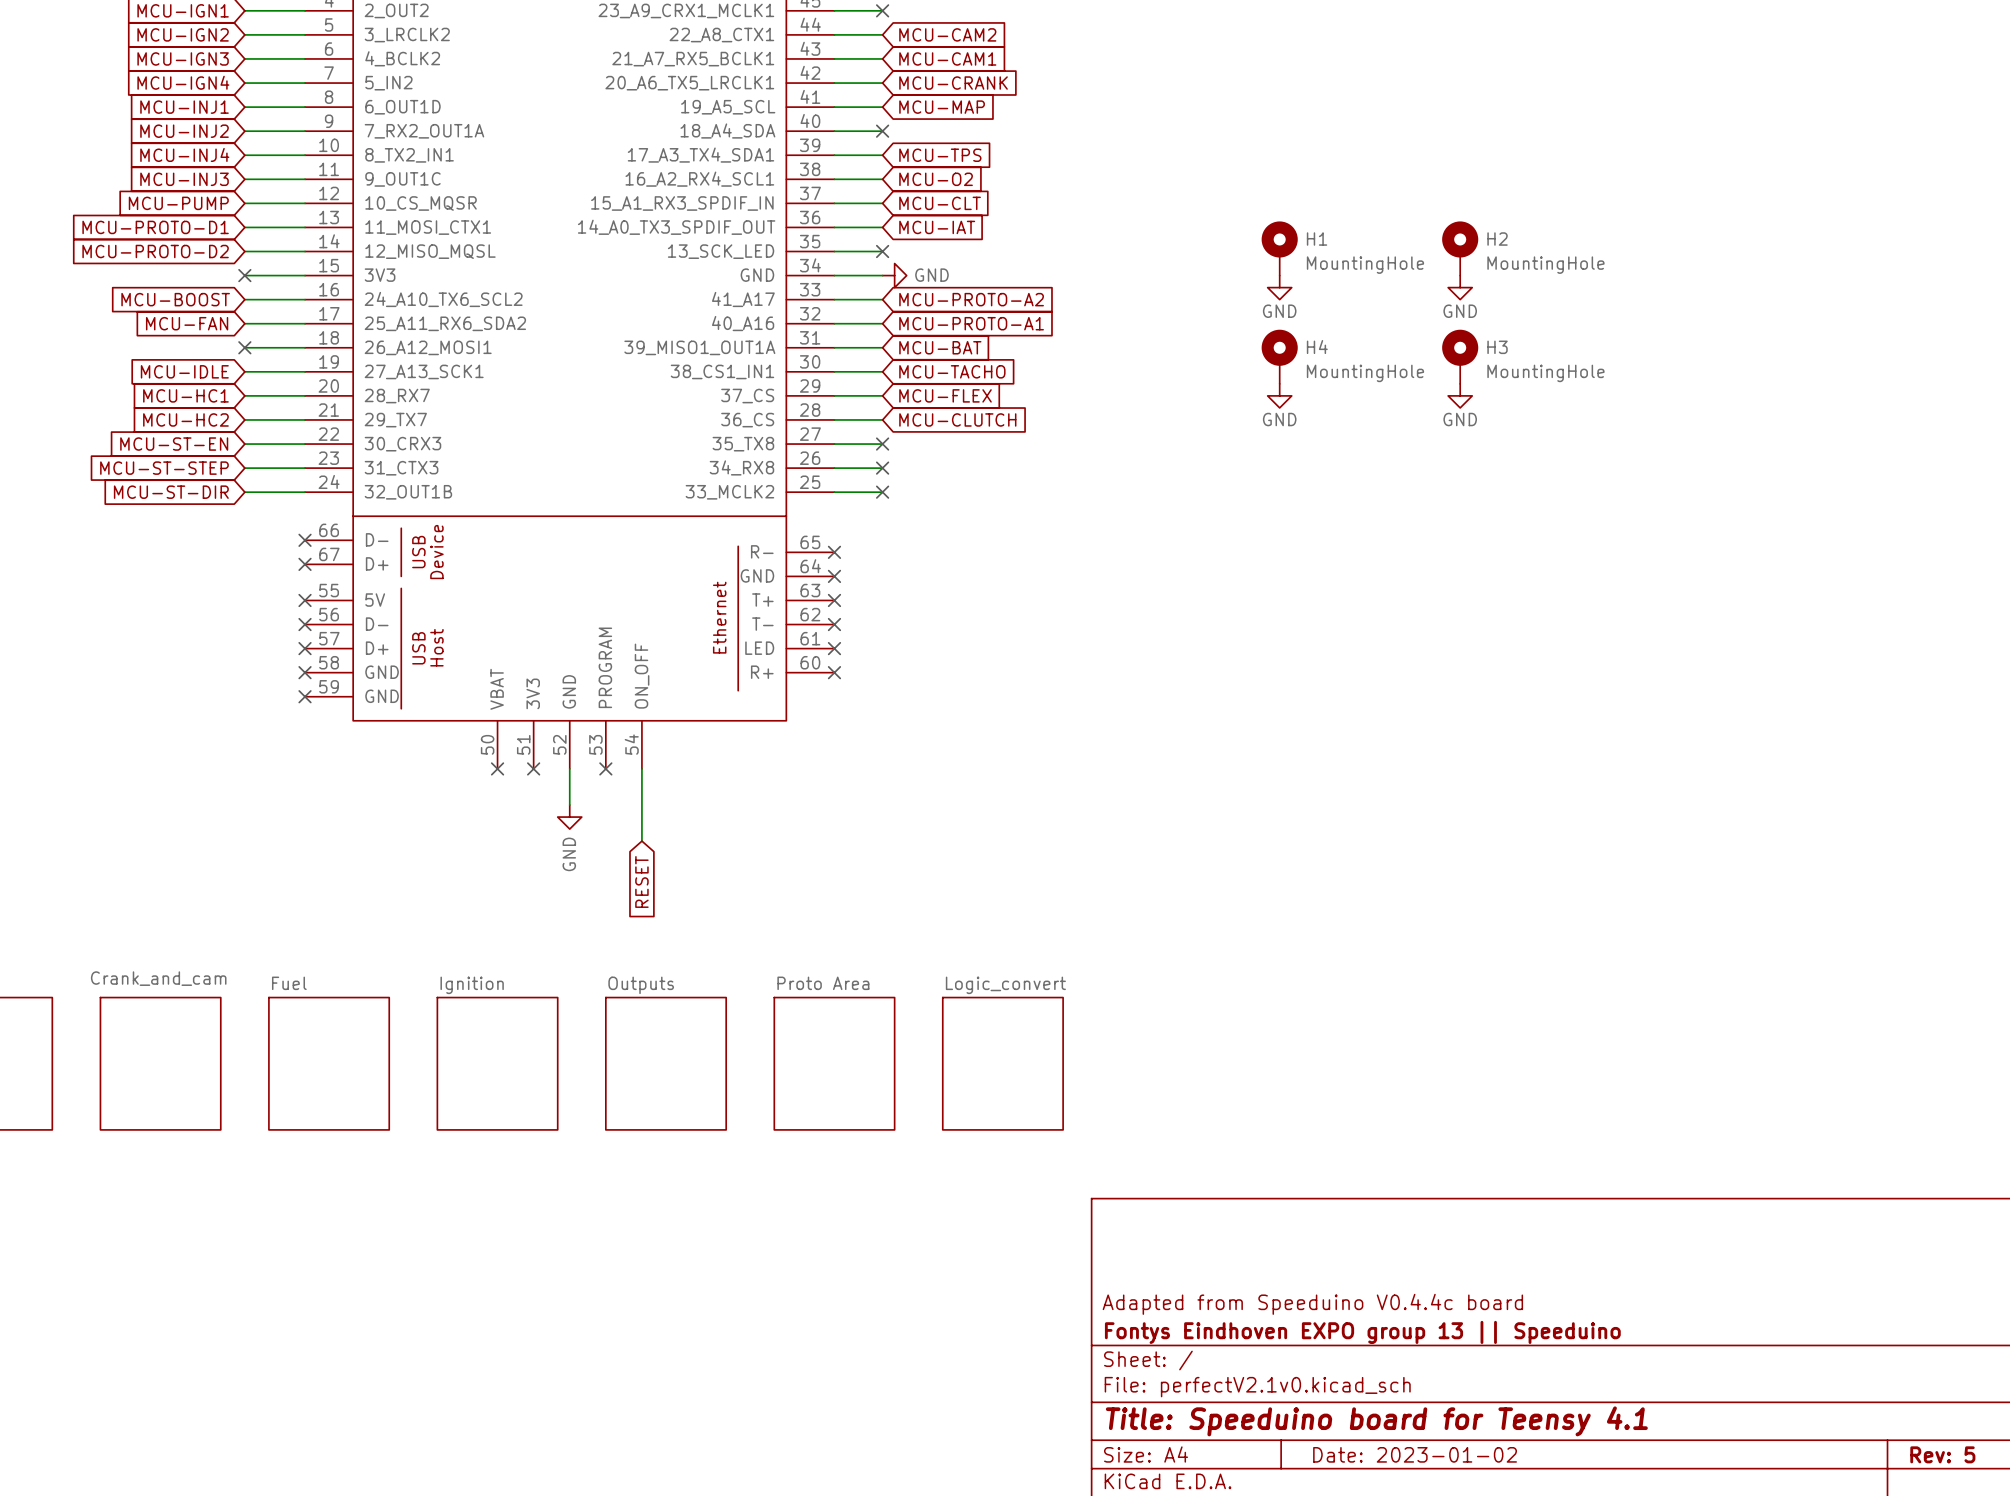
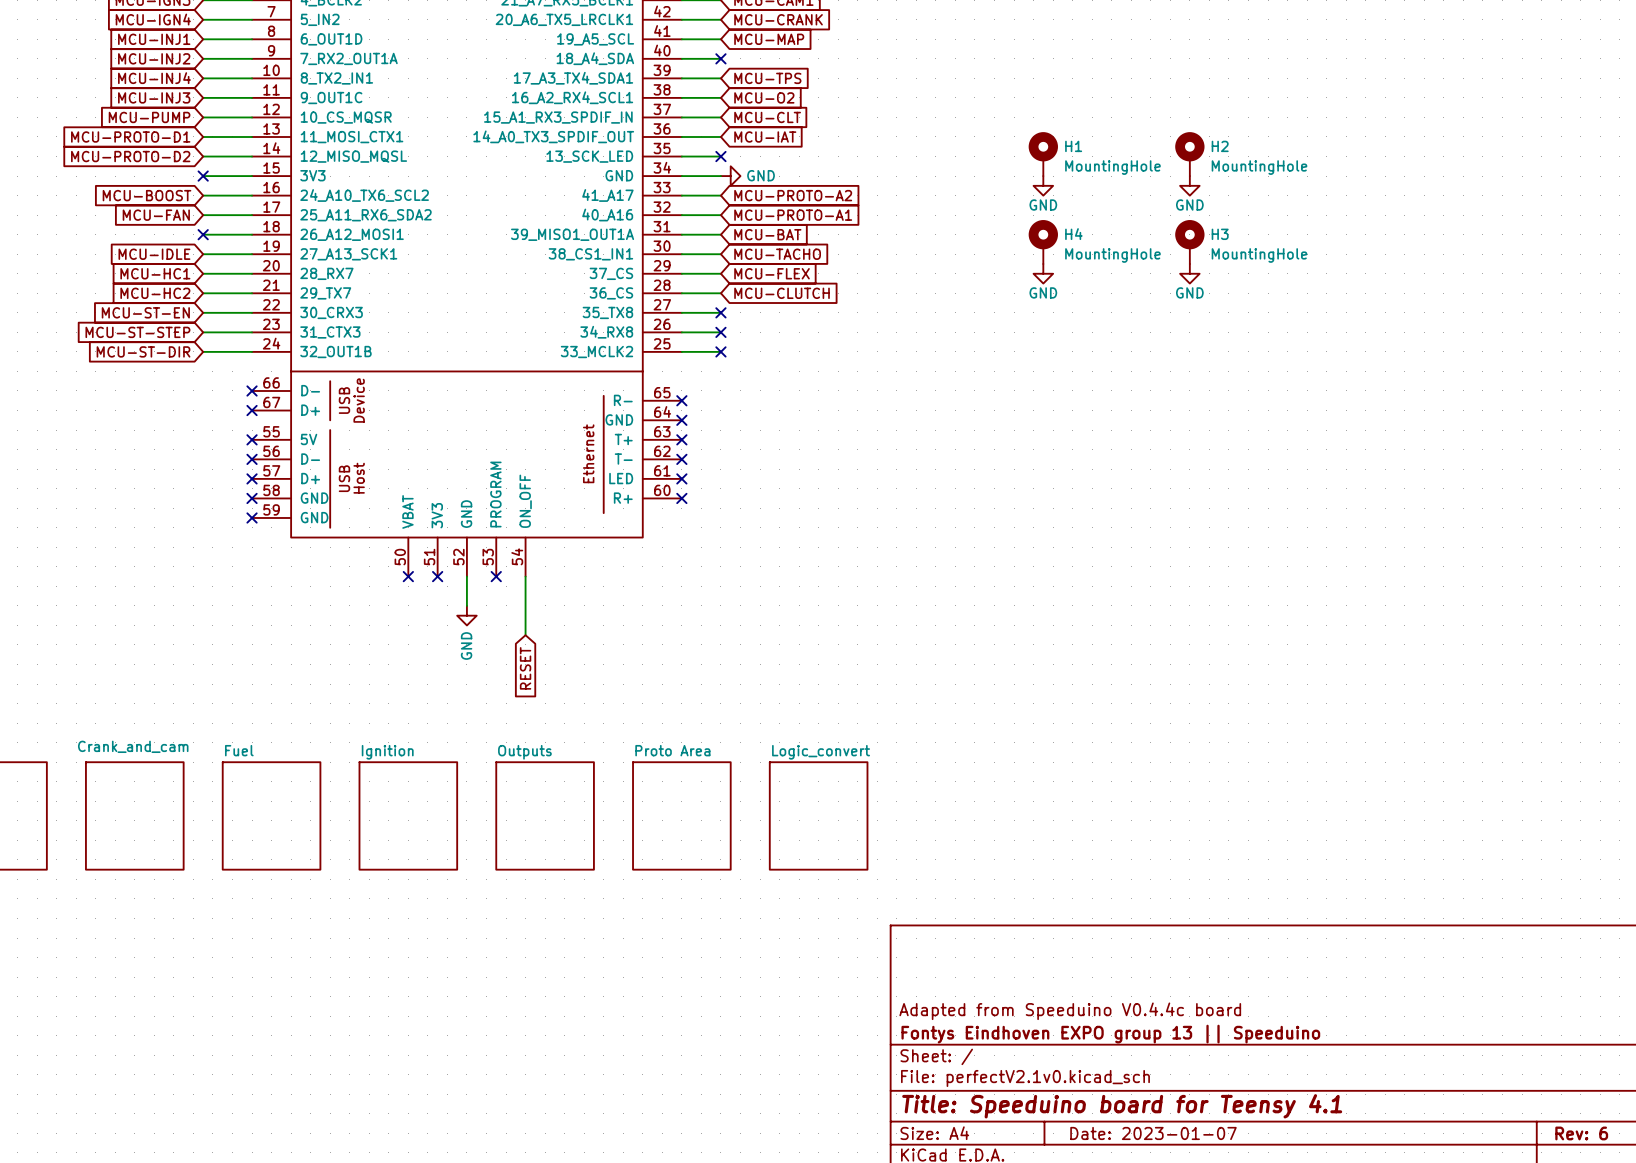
title block: Date: 2023-01-02 (1415, 1454) -> Date: 2023-01-07 (1153, 1133)
title block: Rev: 5 (1942, 1454) -> Rev: 6 (1581, 1133)

